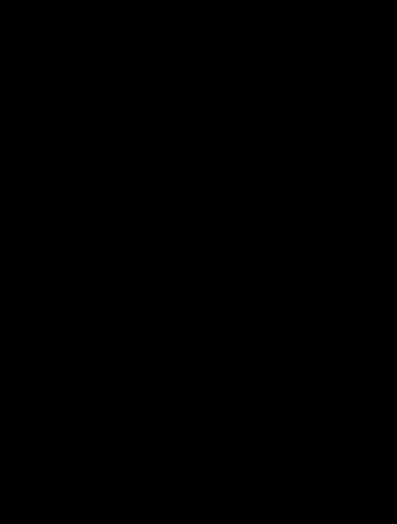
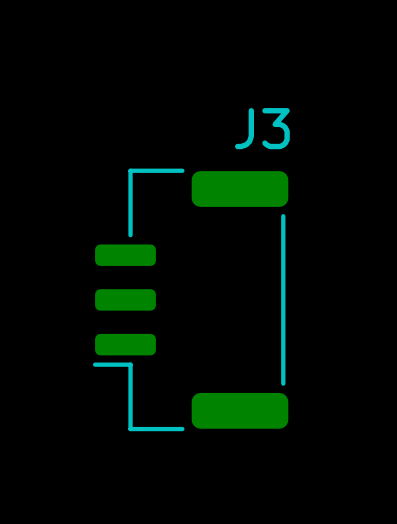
J3: none -> (190, 299)

